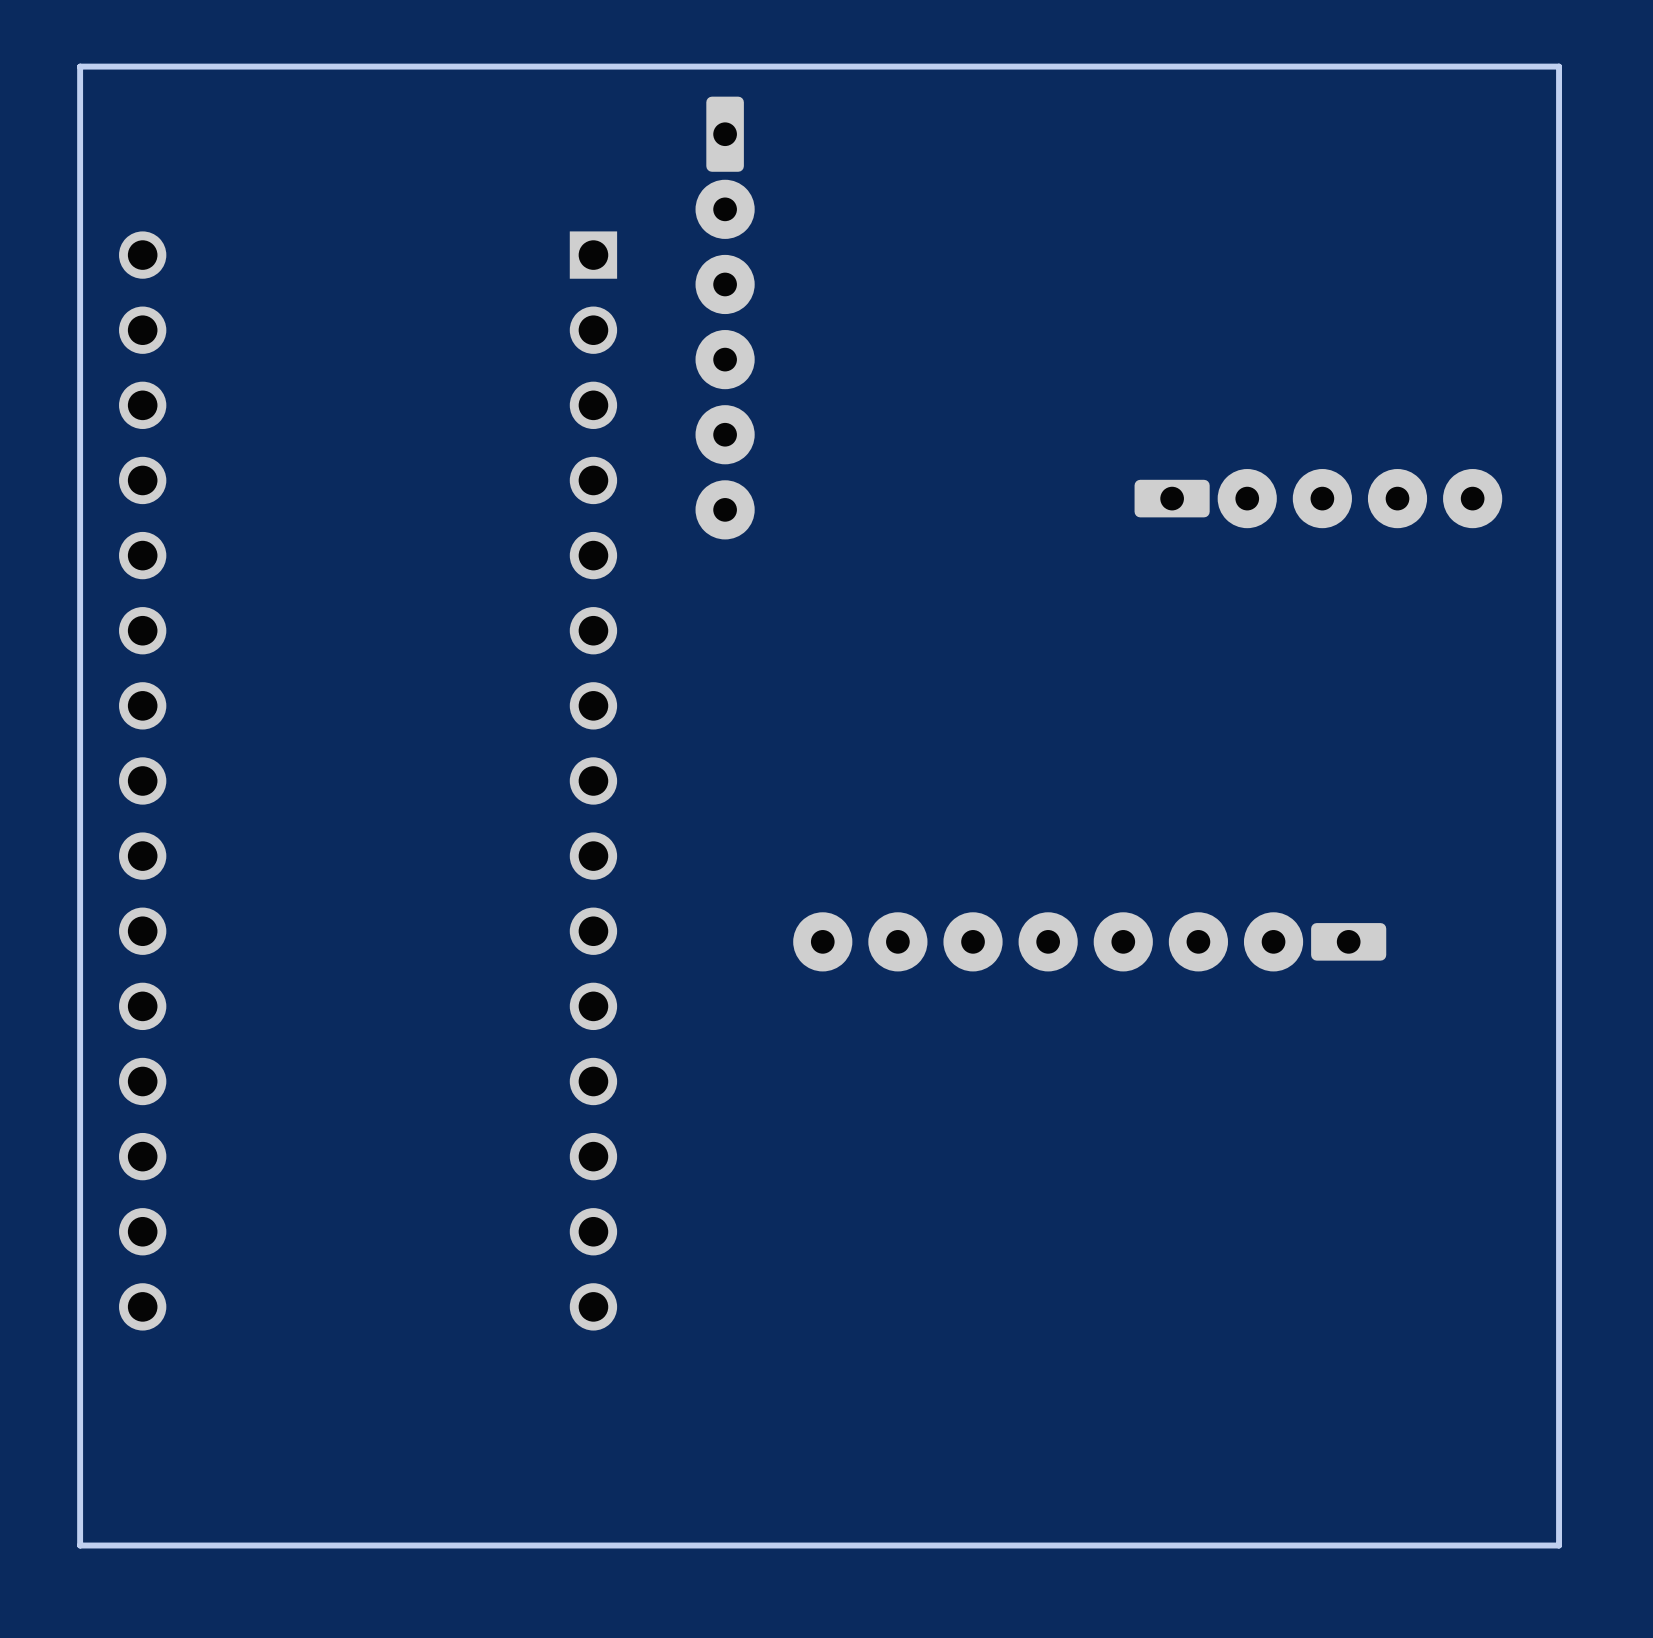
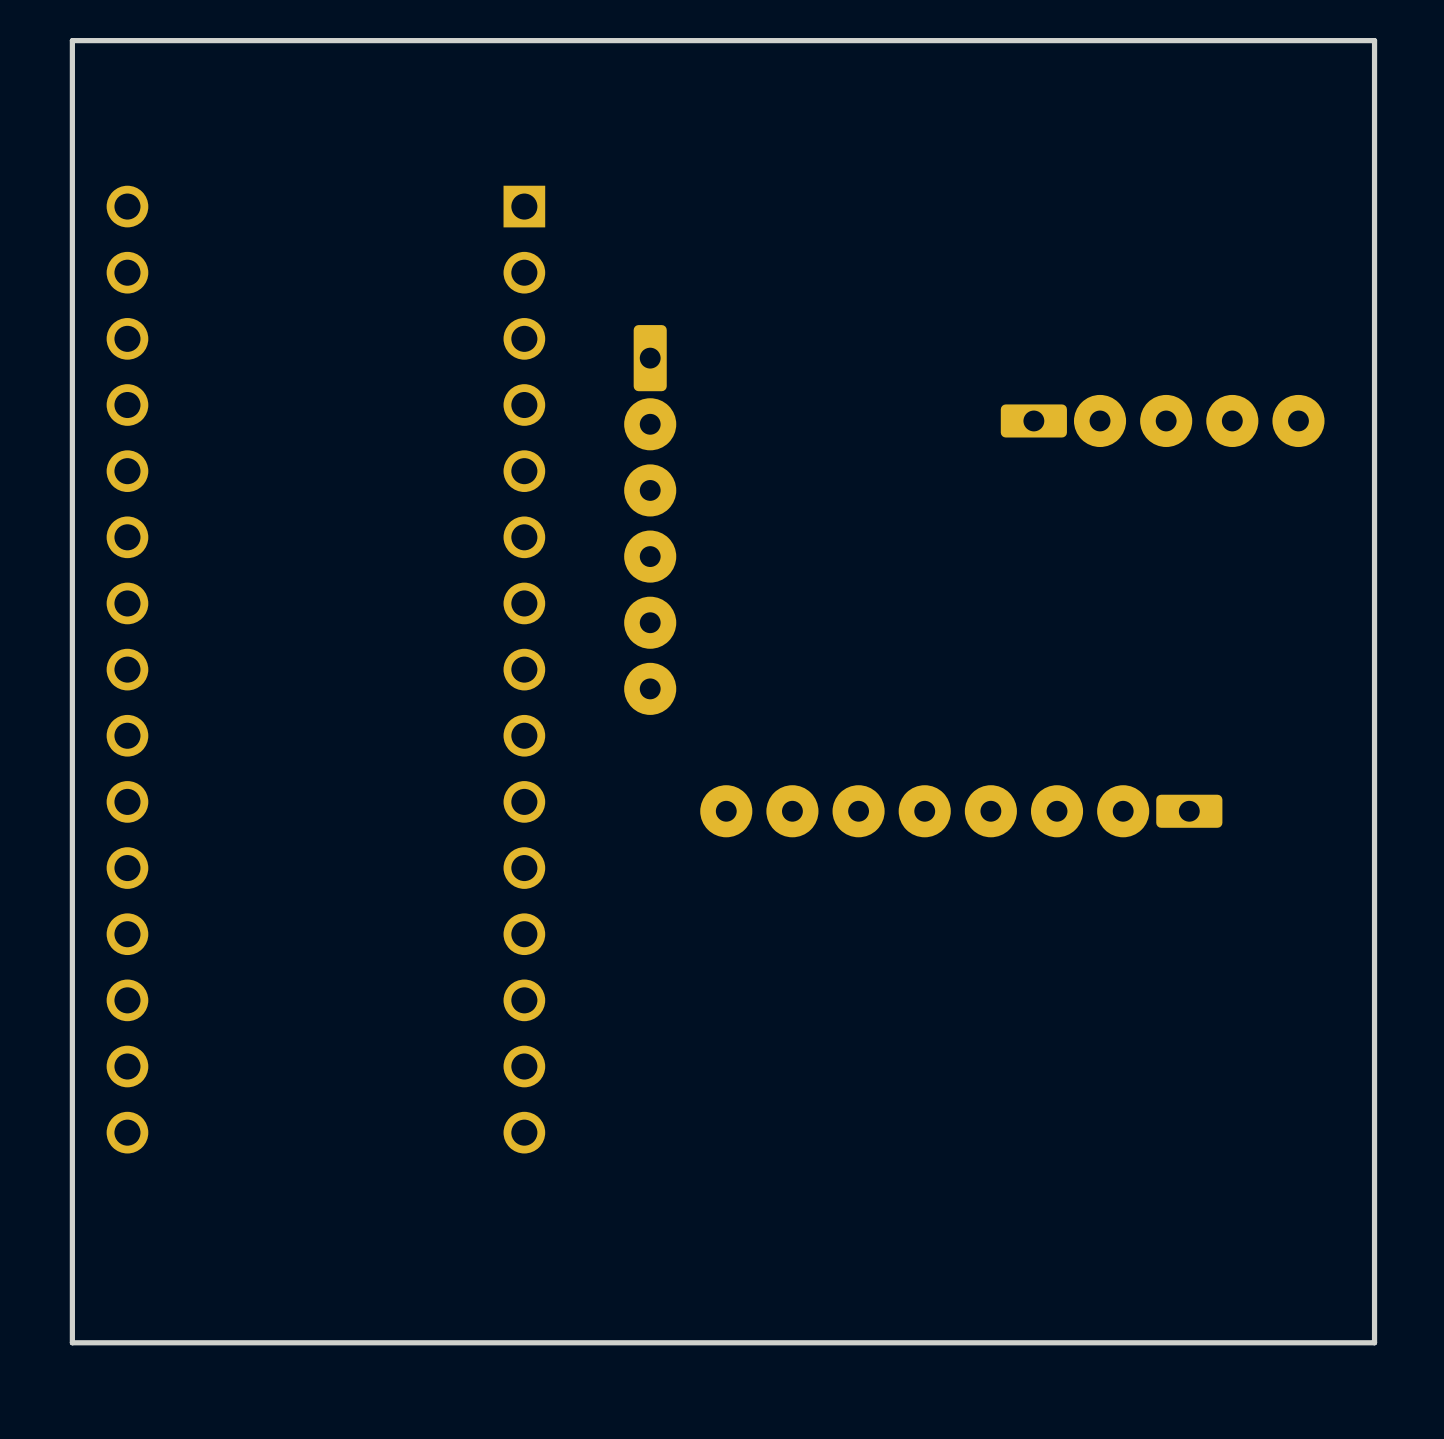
part position: (725, 318) -> (650, 519)

